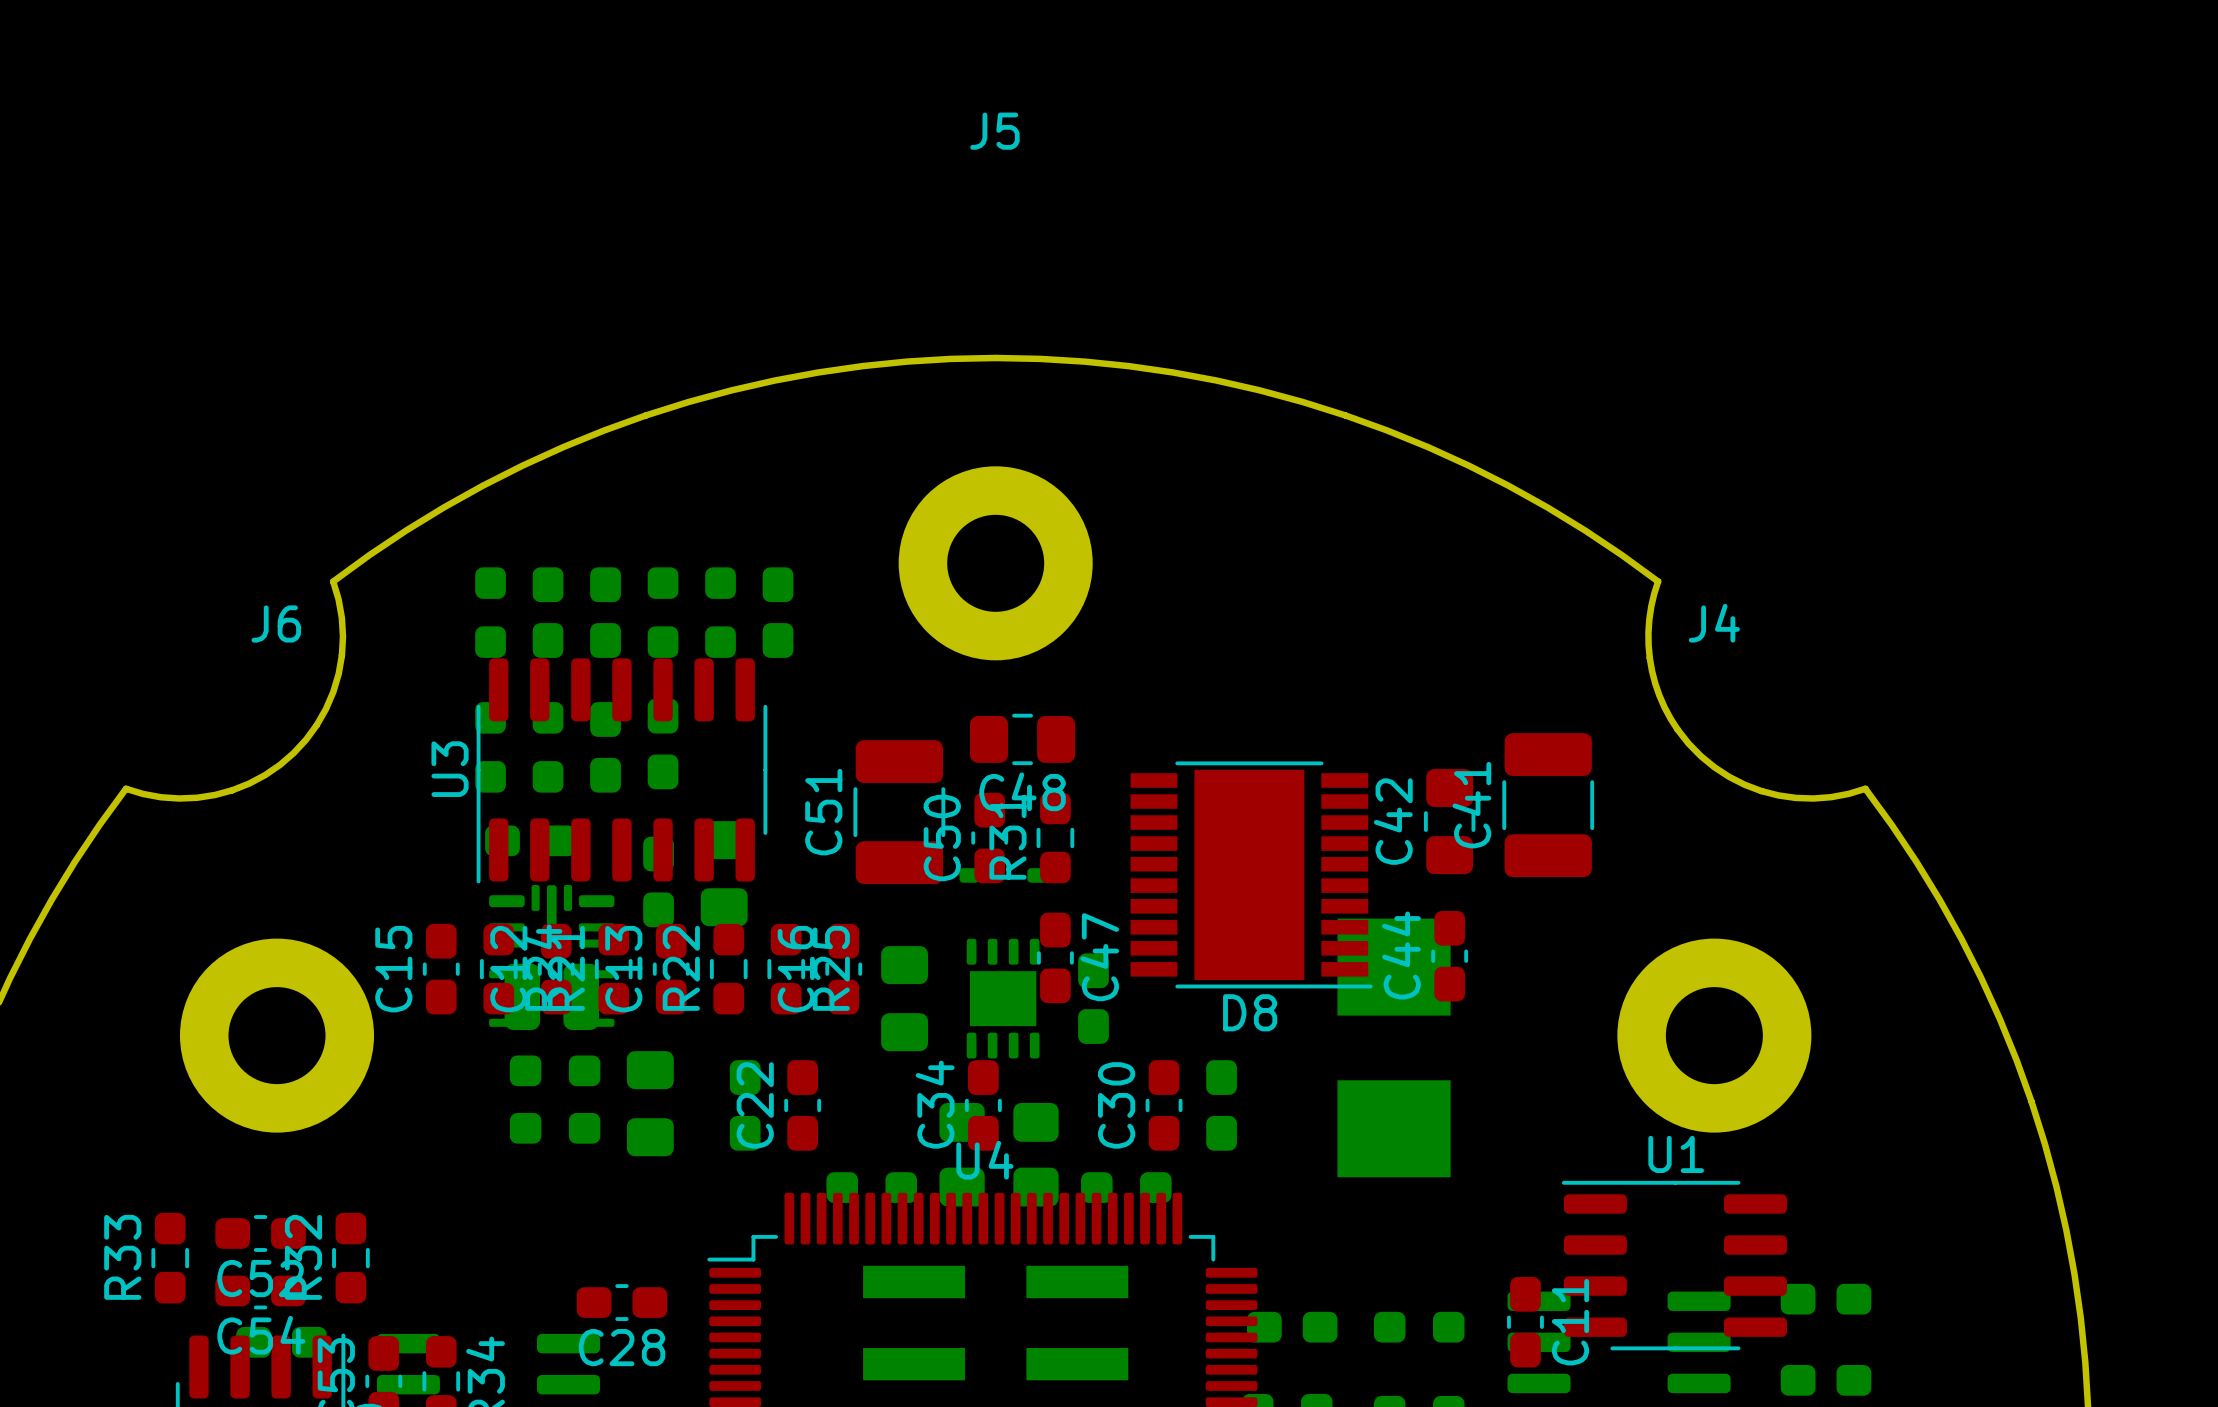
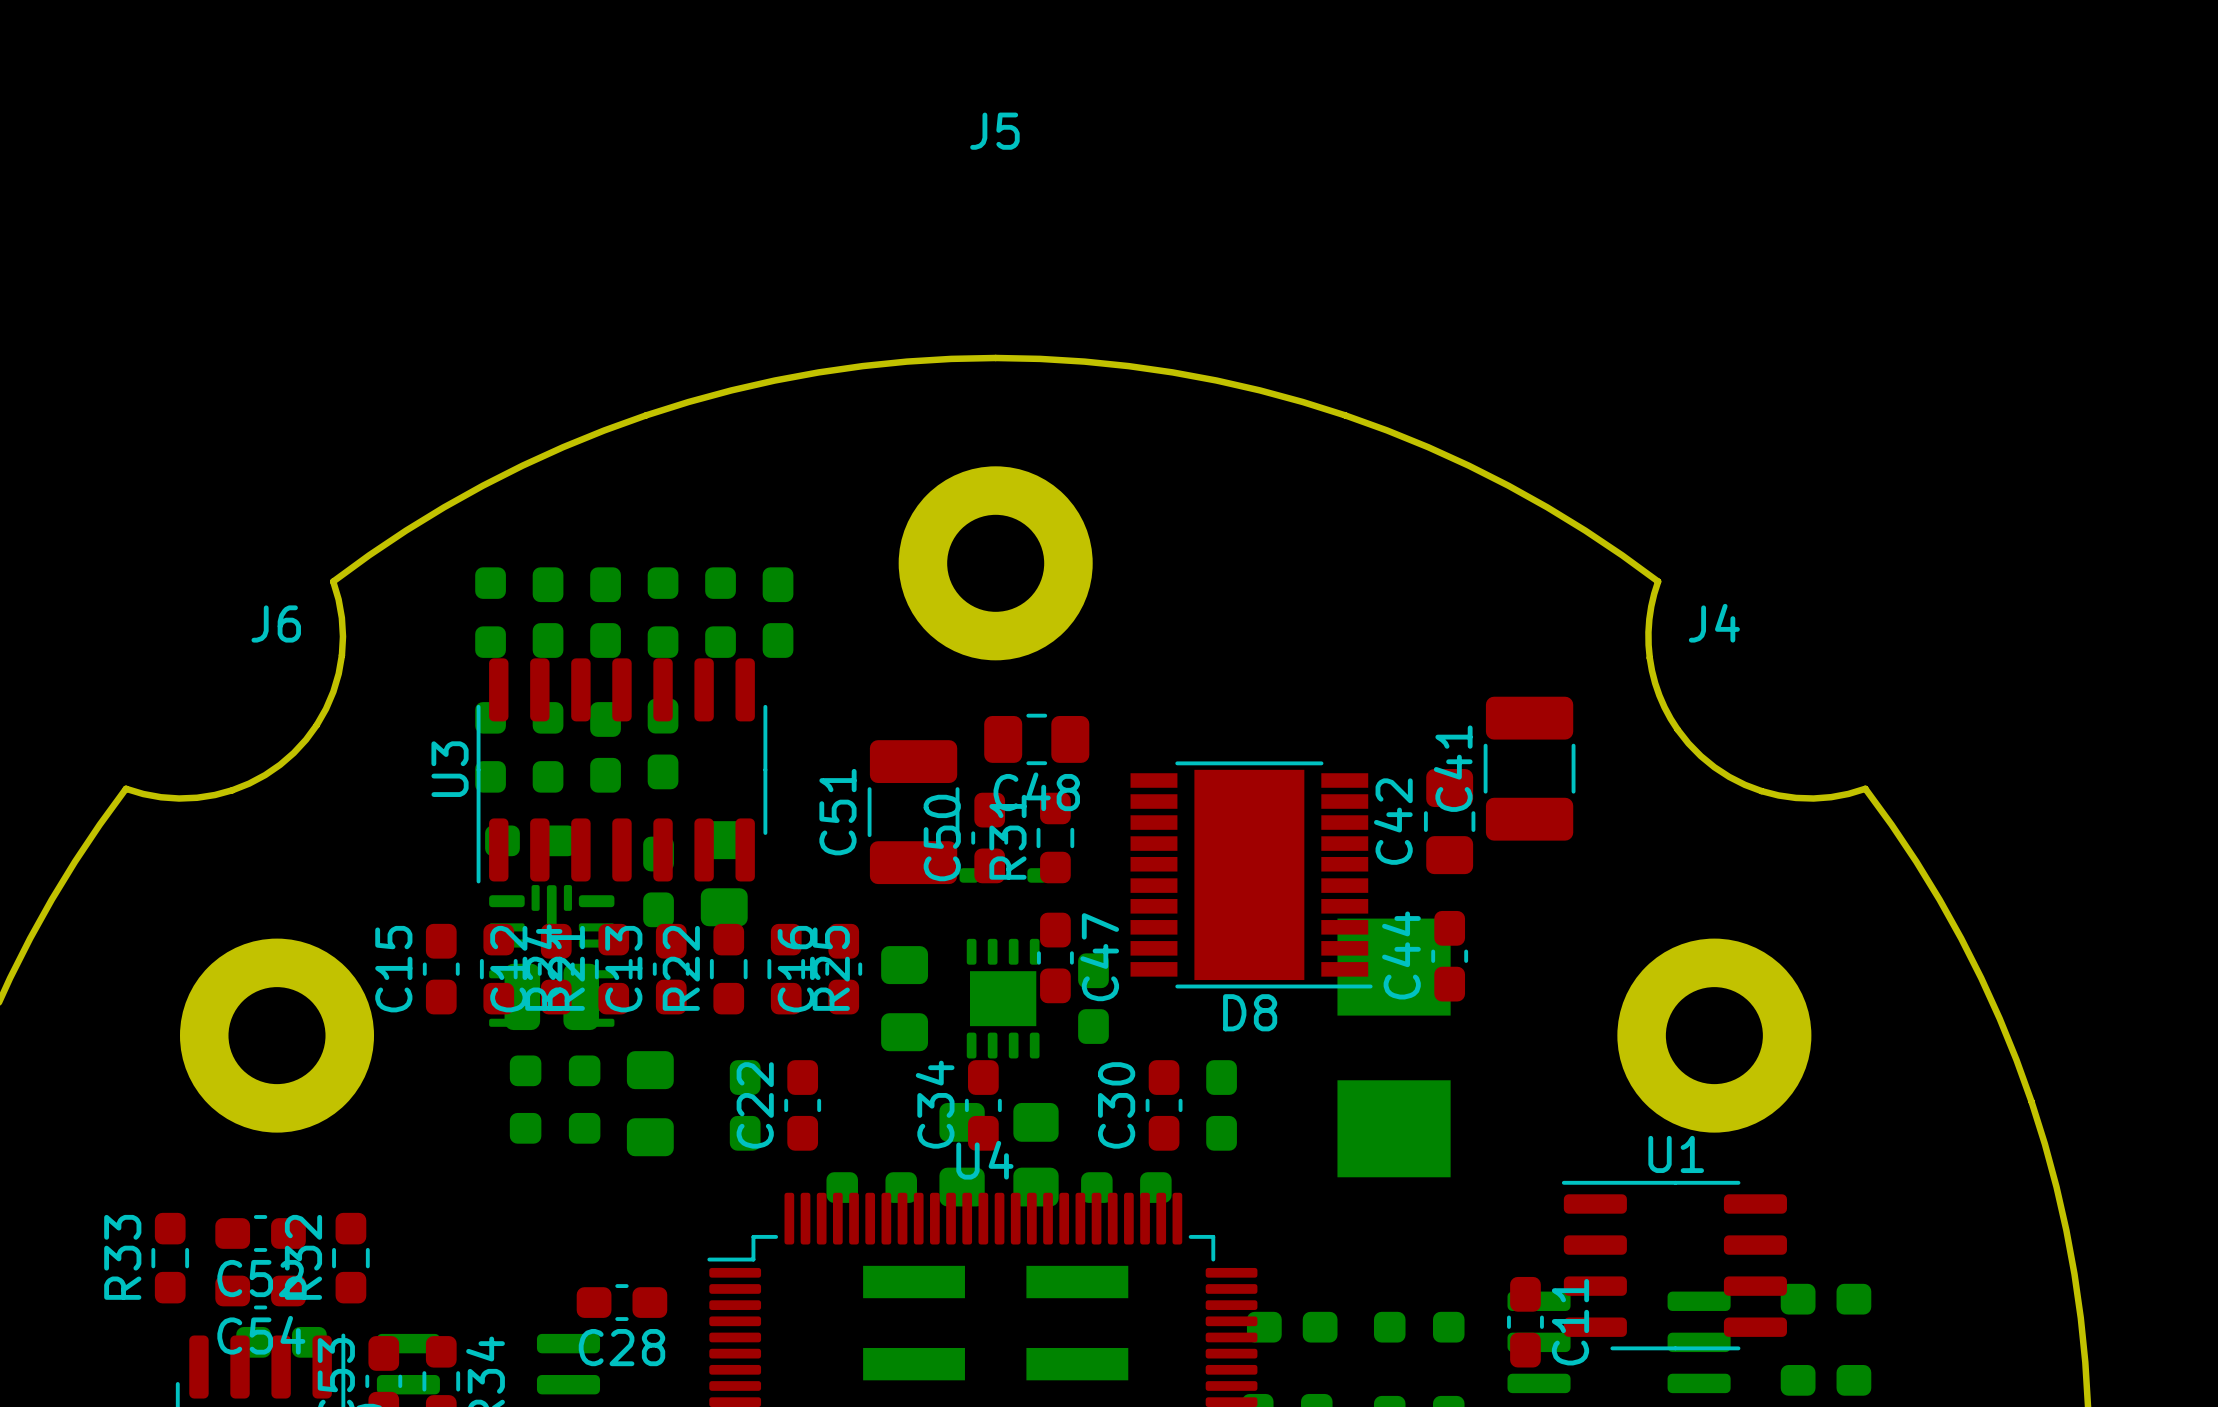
C48 position: (1022, 739) -> (1036, 739)
C41 position: (1548, 805) -> (1529, 768)
C51 position: (899, 812) -> (913, 812)

